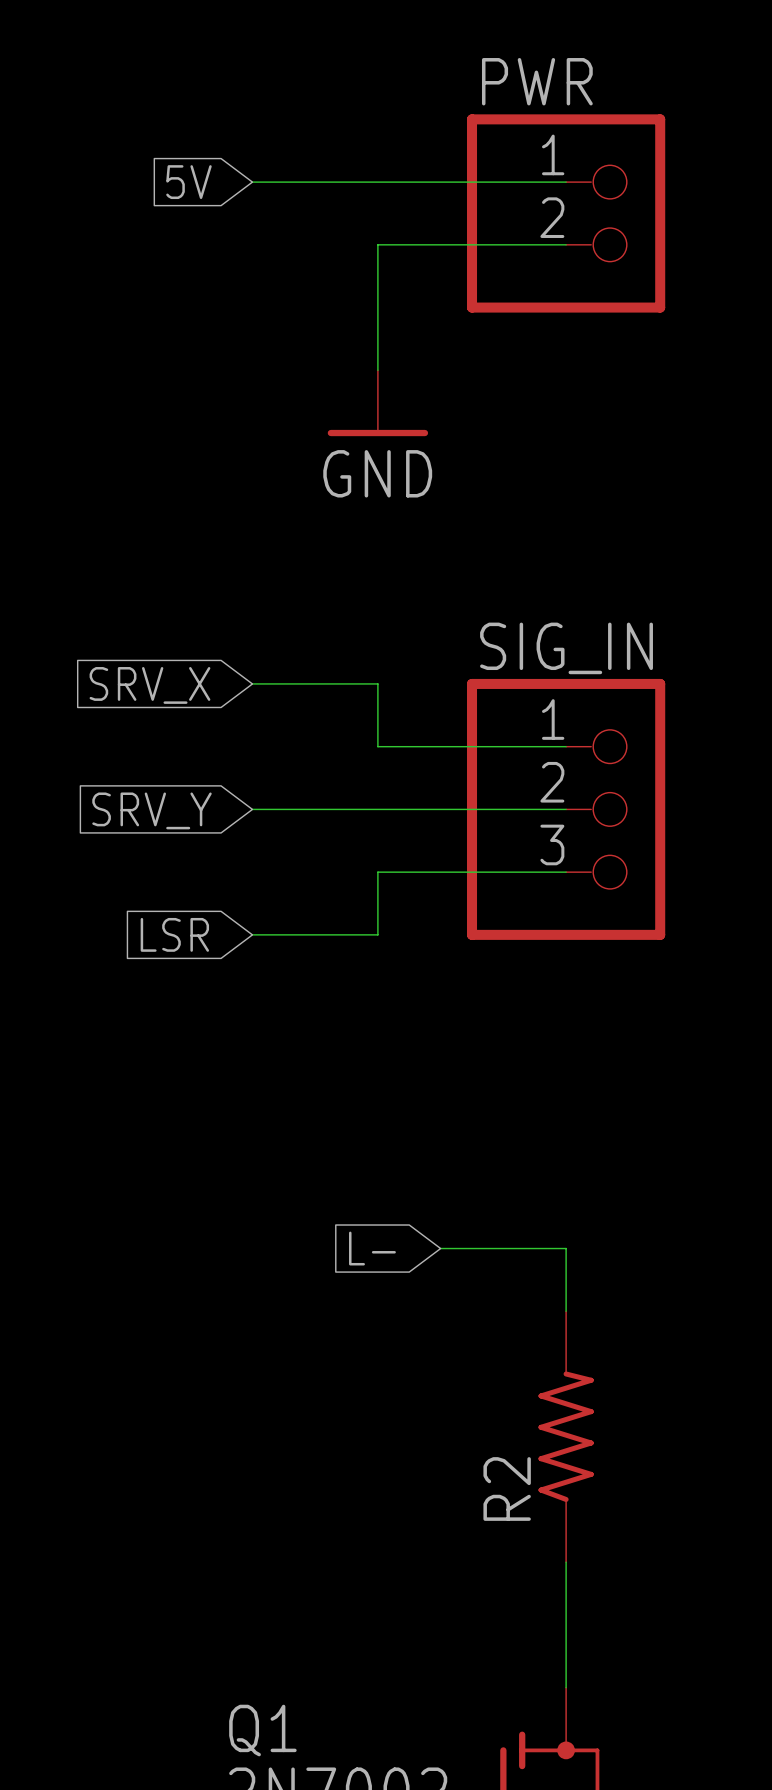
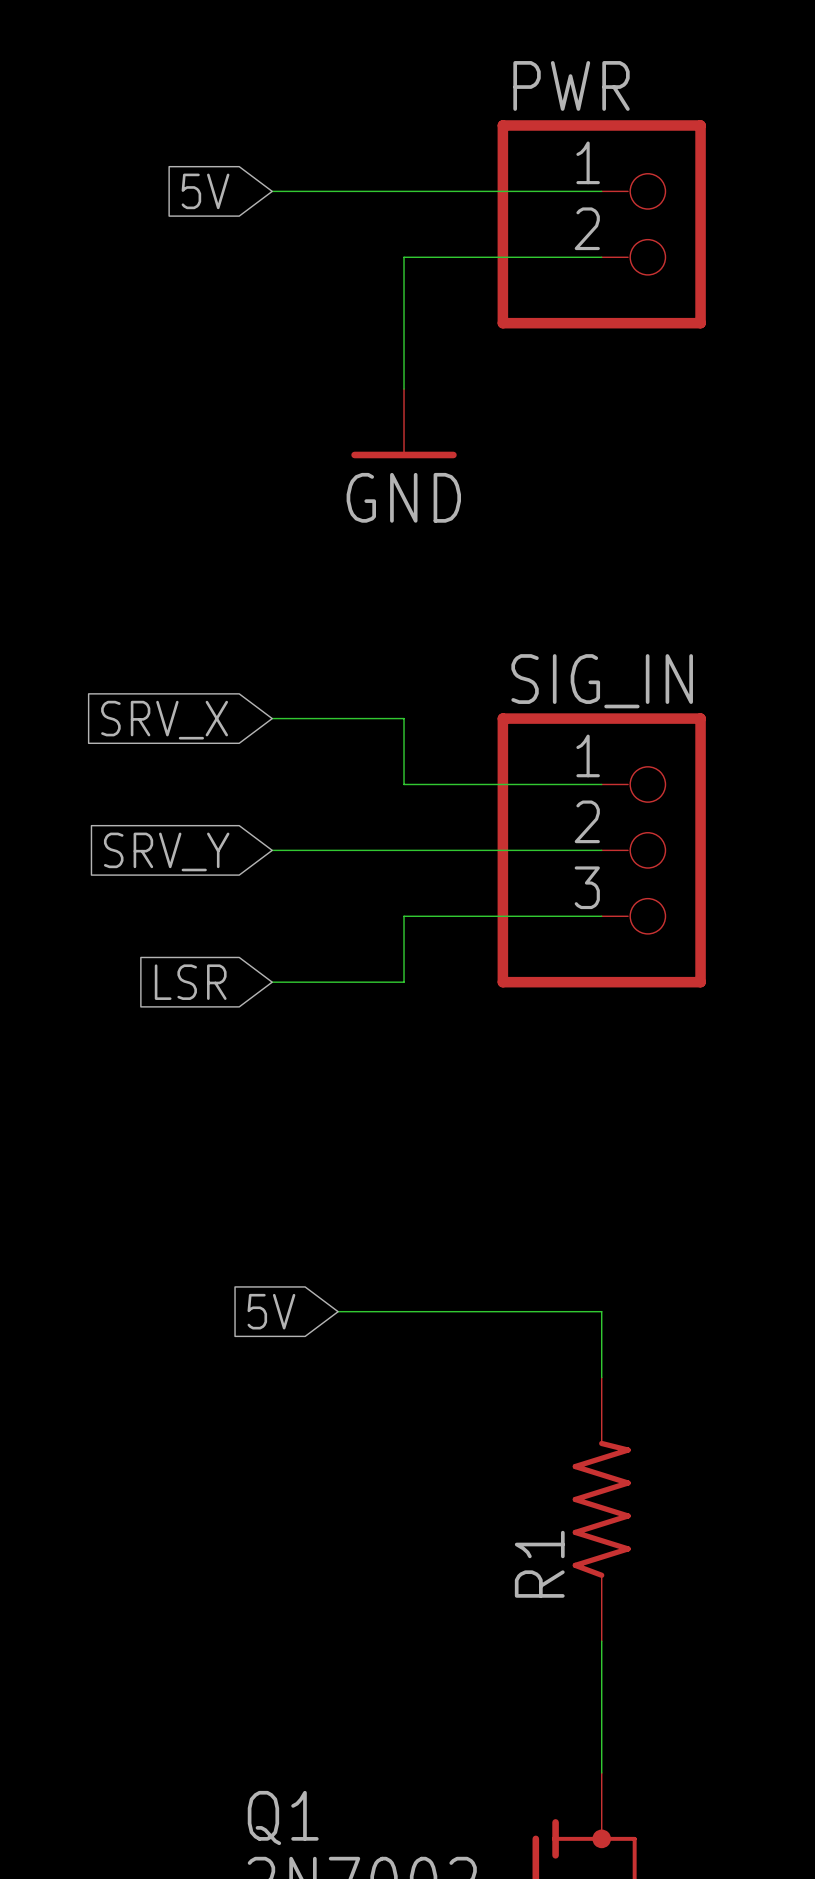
global label: none -> 5V (271, 1311)
wire: none -> (338, 1311) (469, 1311)
global label: L- (372, 1248) -> none
R2 name: R2 (507, 1489) -> R1 (539, 1564)

